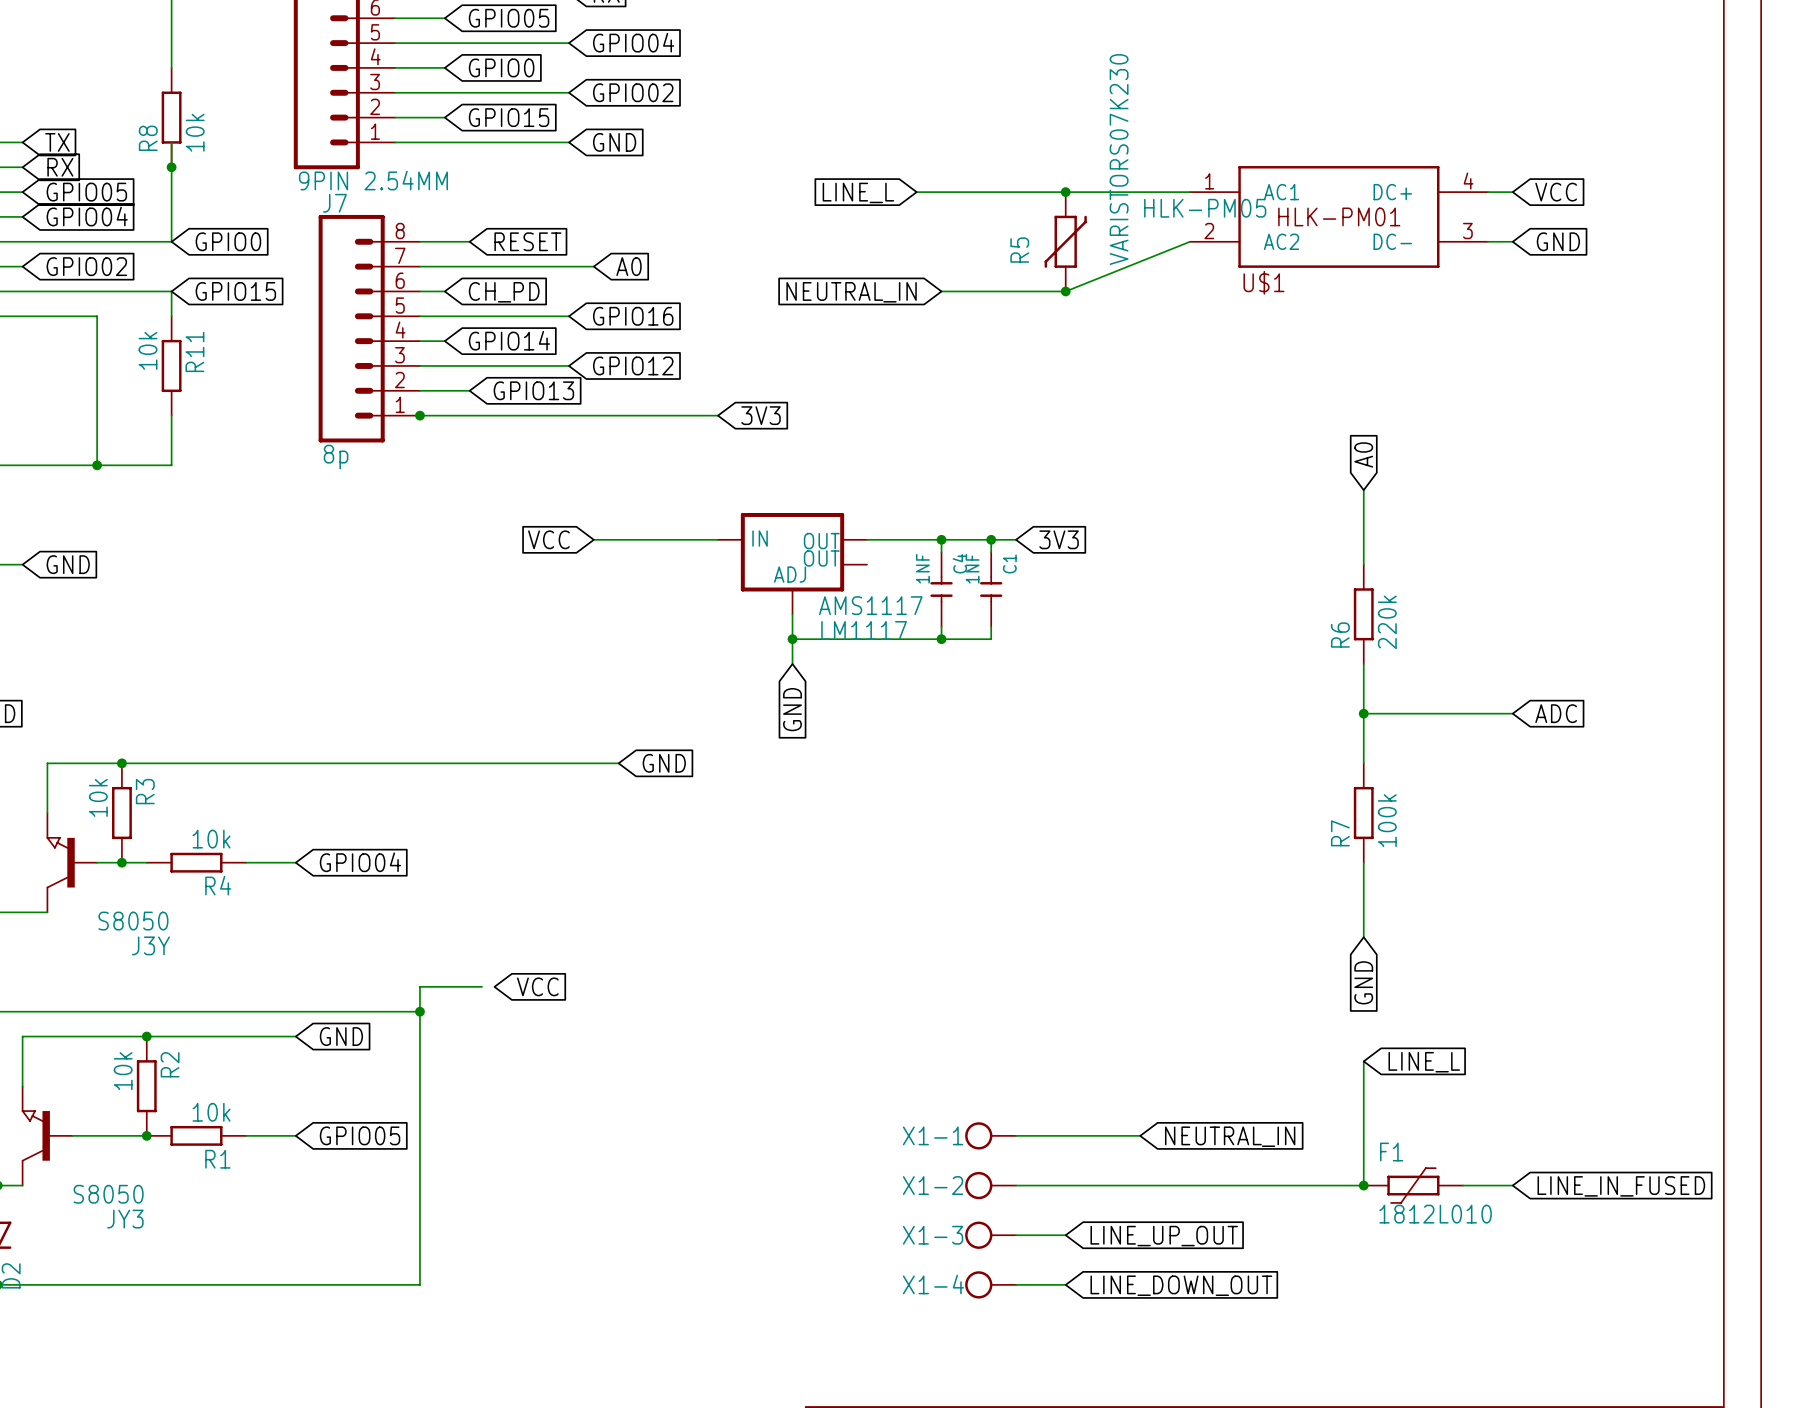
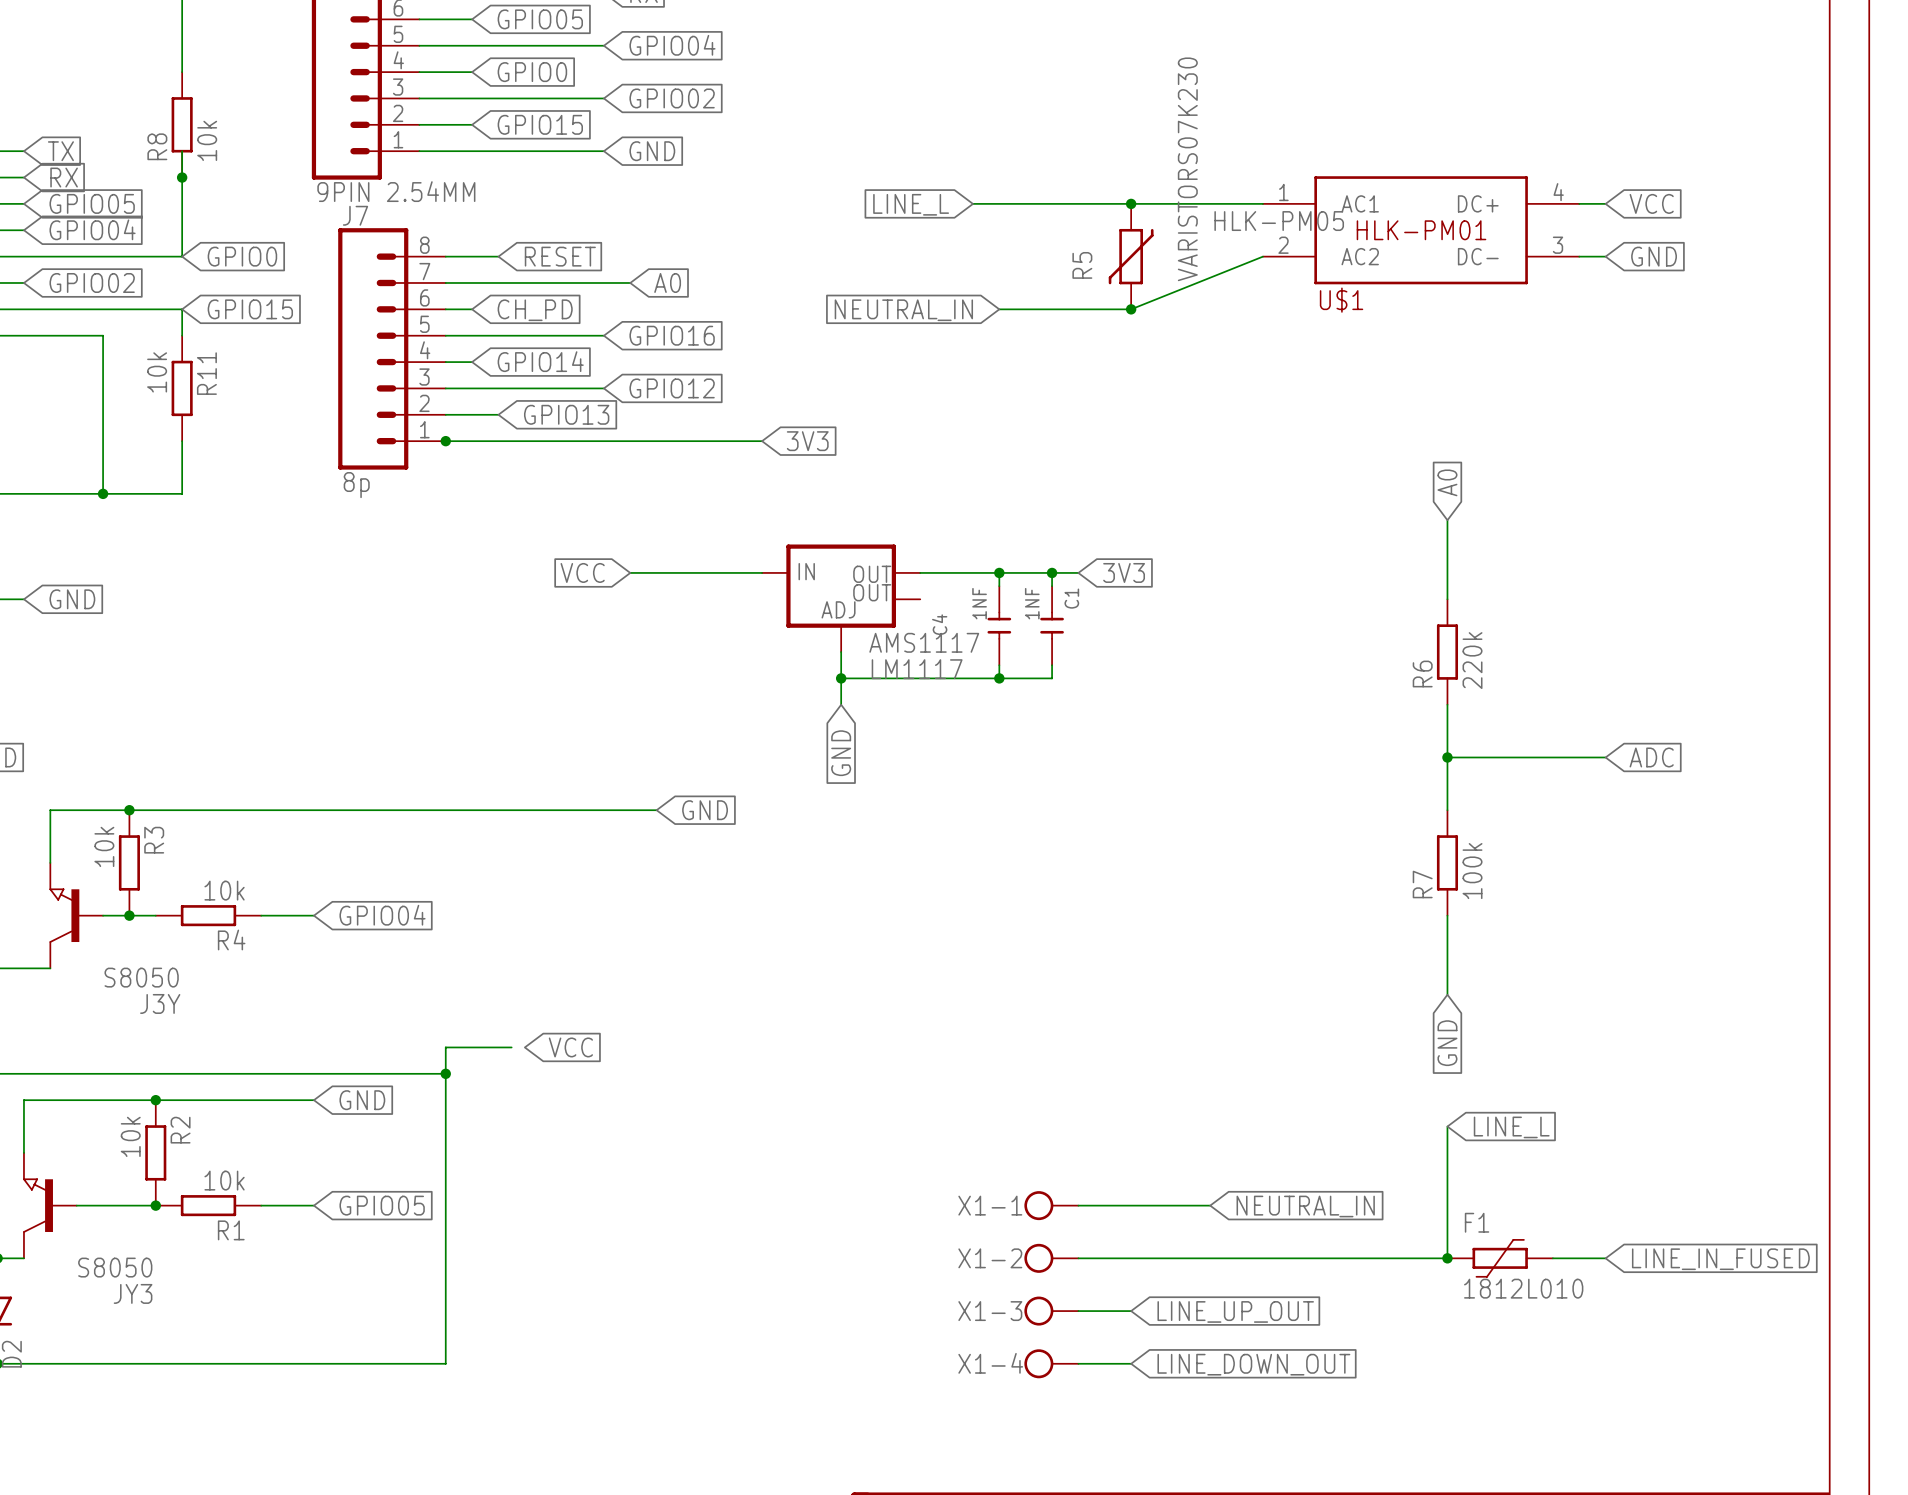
C4 name position: C4 (959, 563) -> C4 (939, 624)

